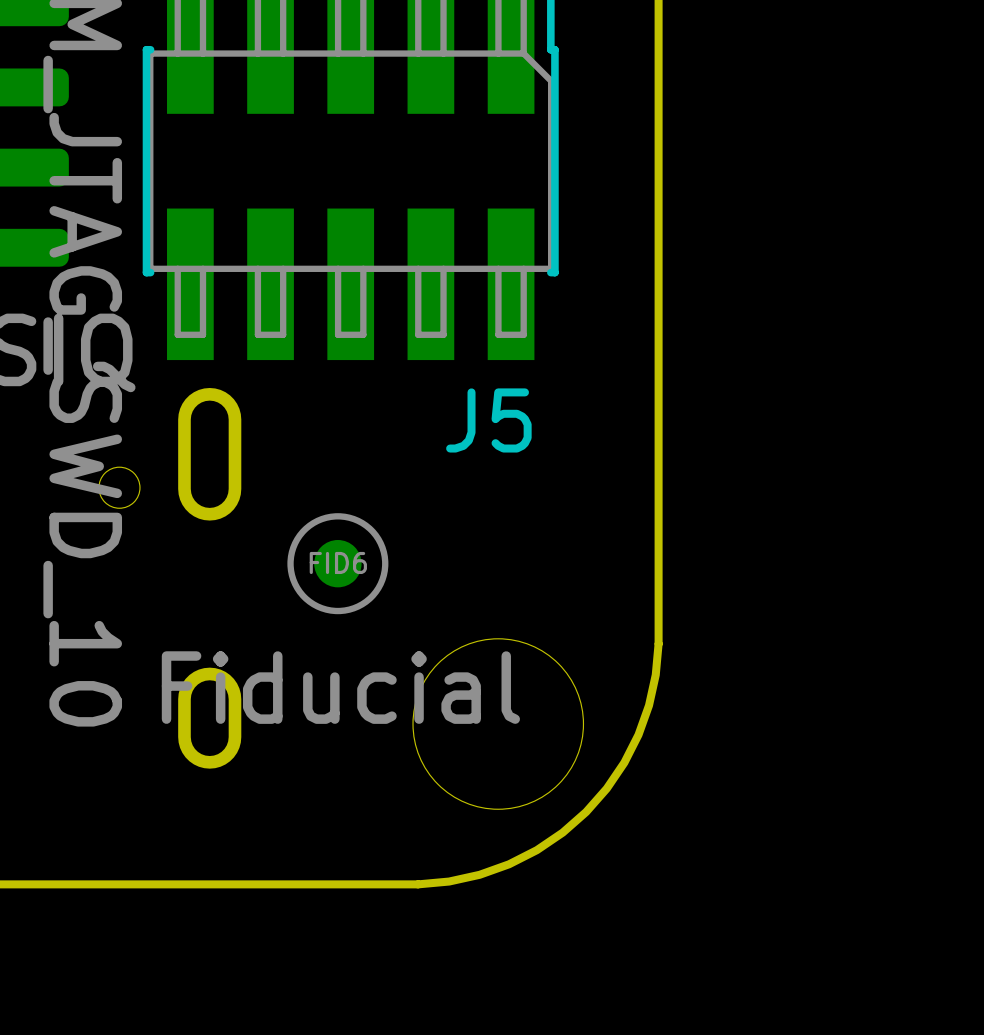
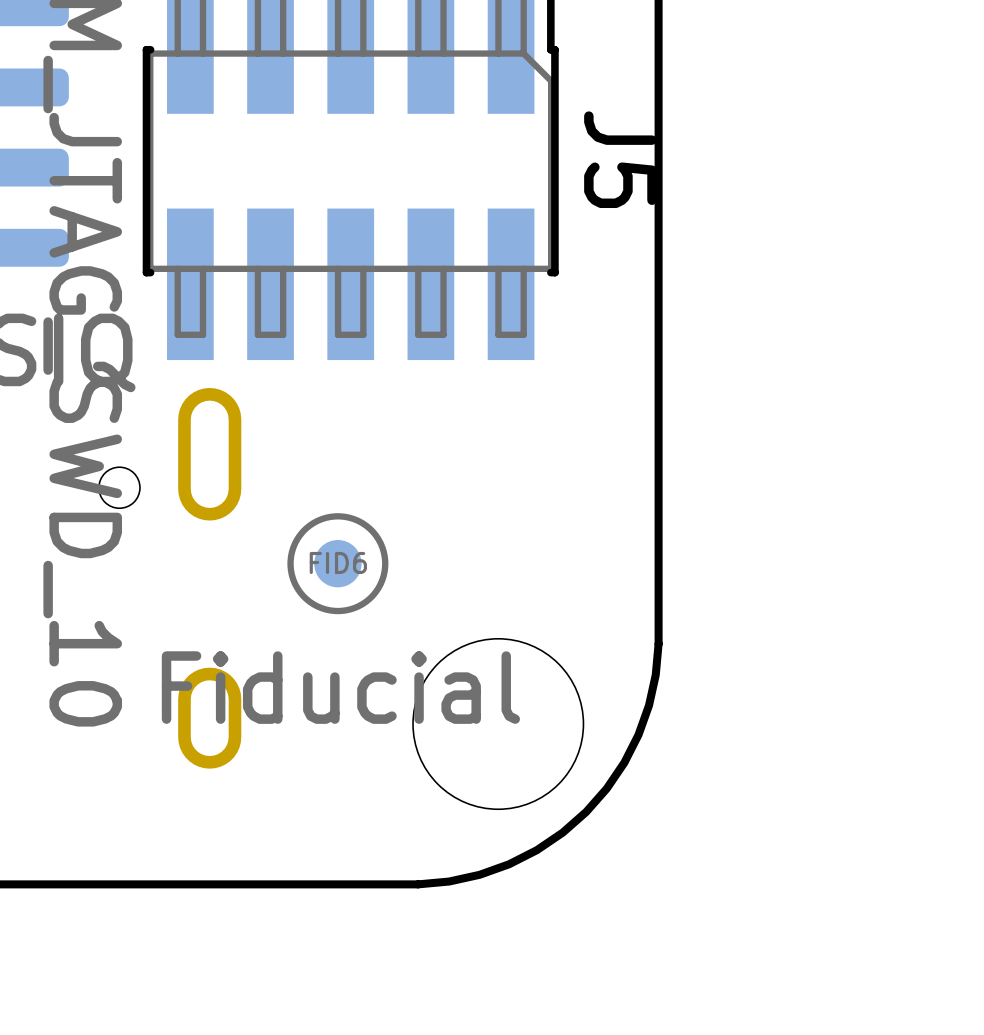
J5 name rotation: 0° (488, 420) -> 90° clockwise (620, 159)
J5 name position: J5 (488, 420) -> J5 (620, 159)

